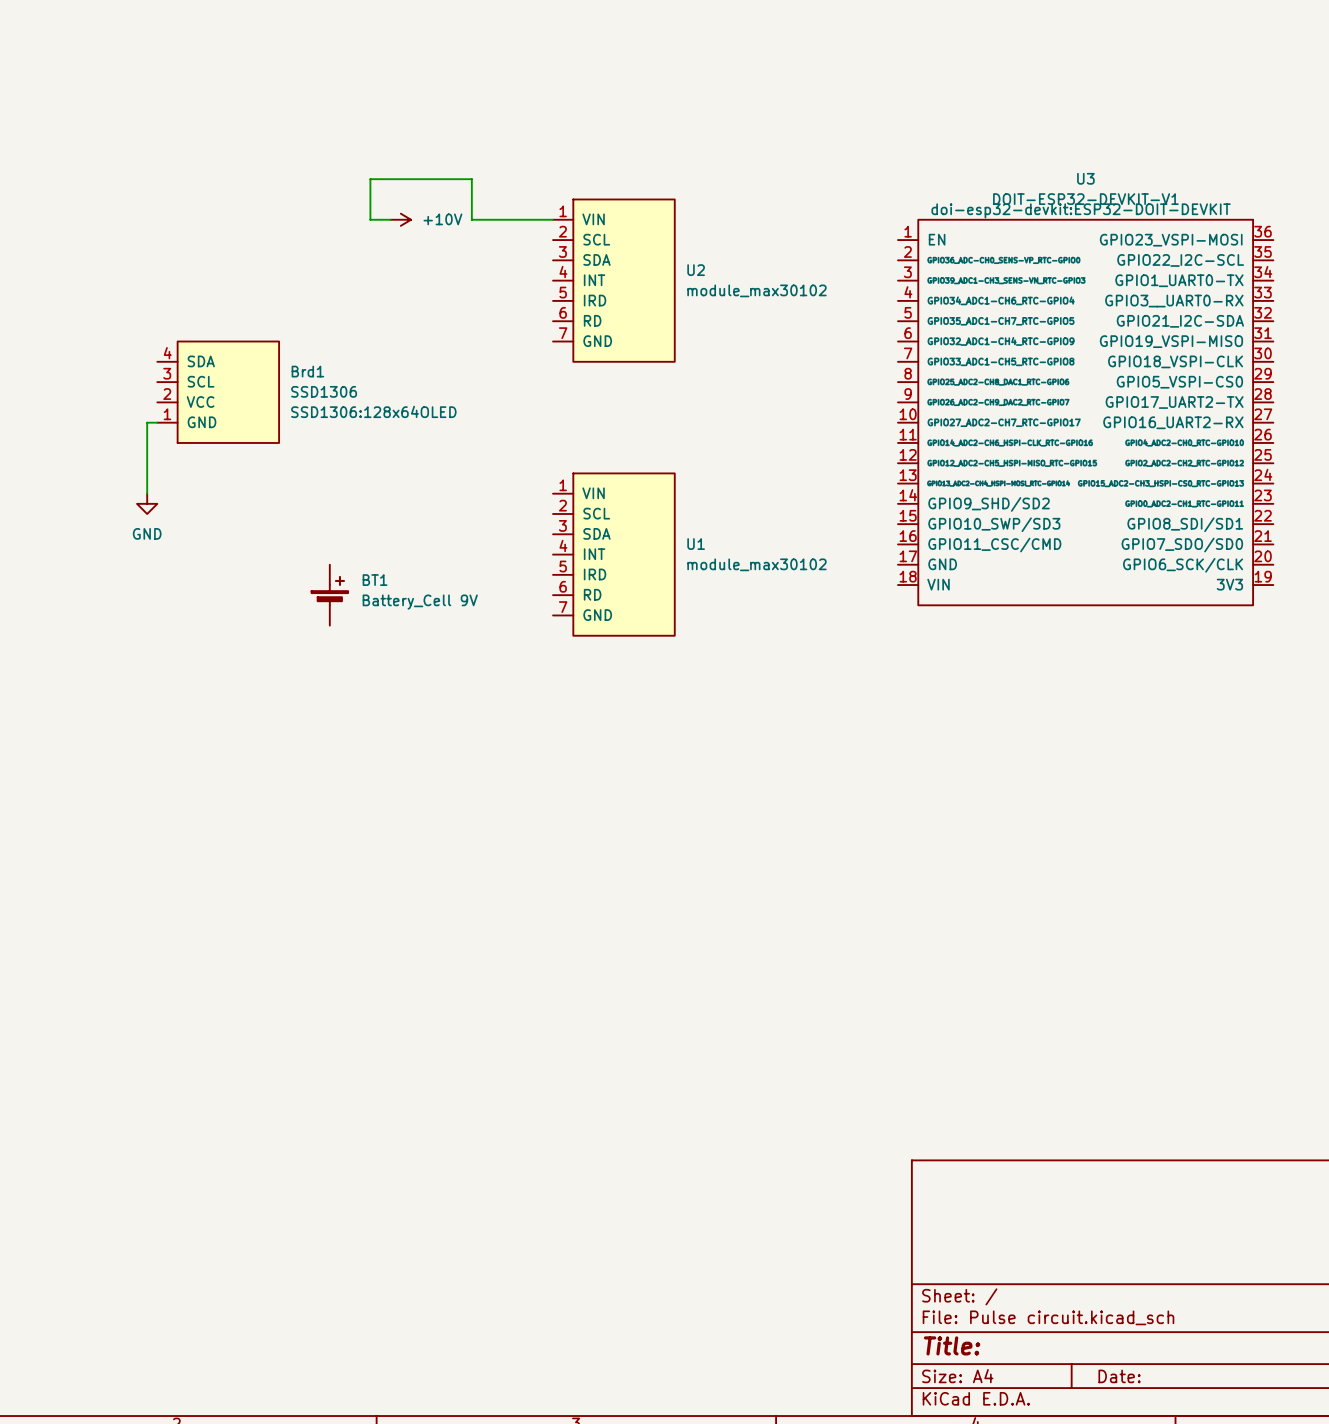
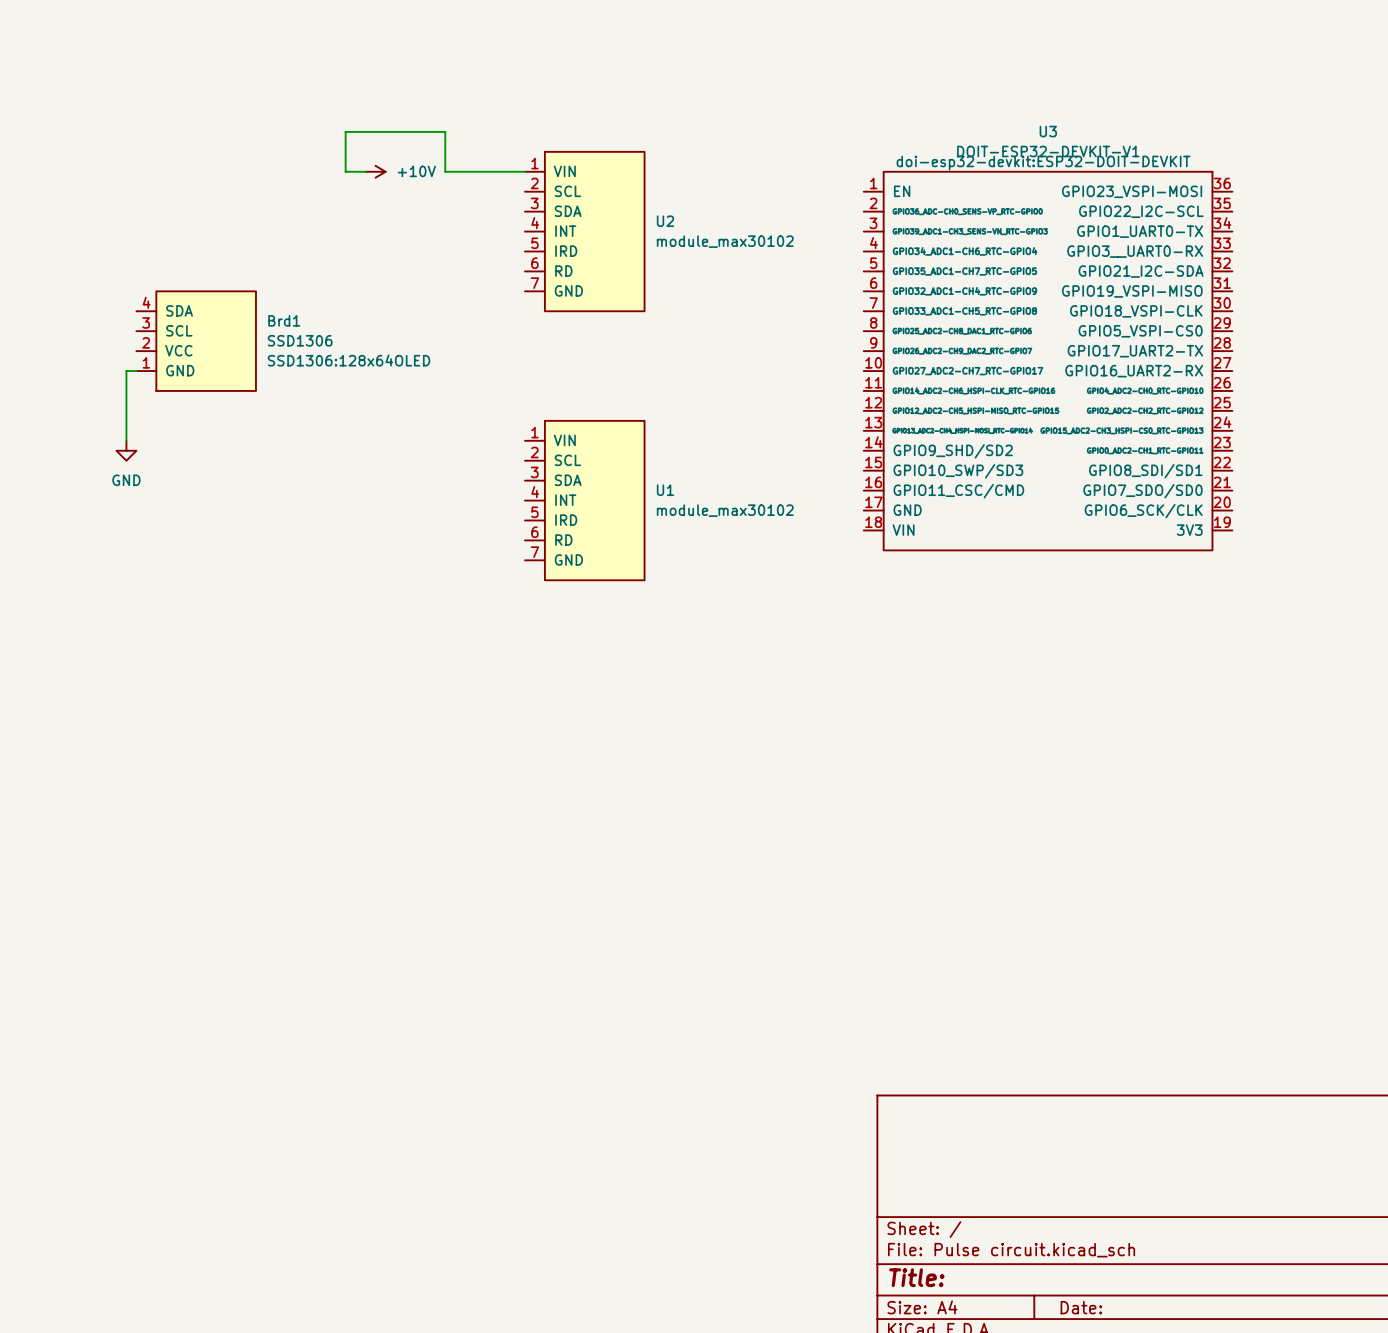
BT1: Battery_Cell 9V (329, 595) -> none

